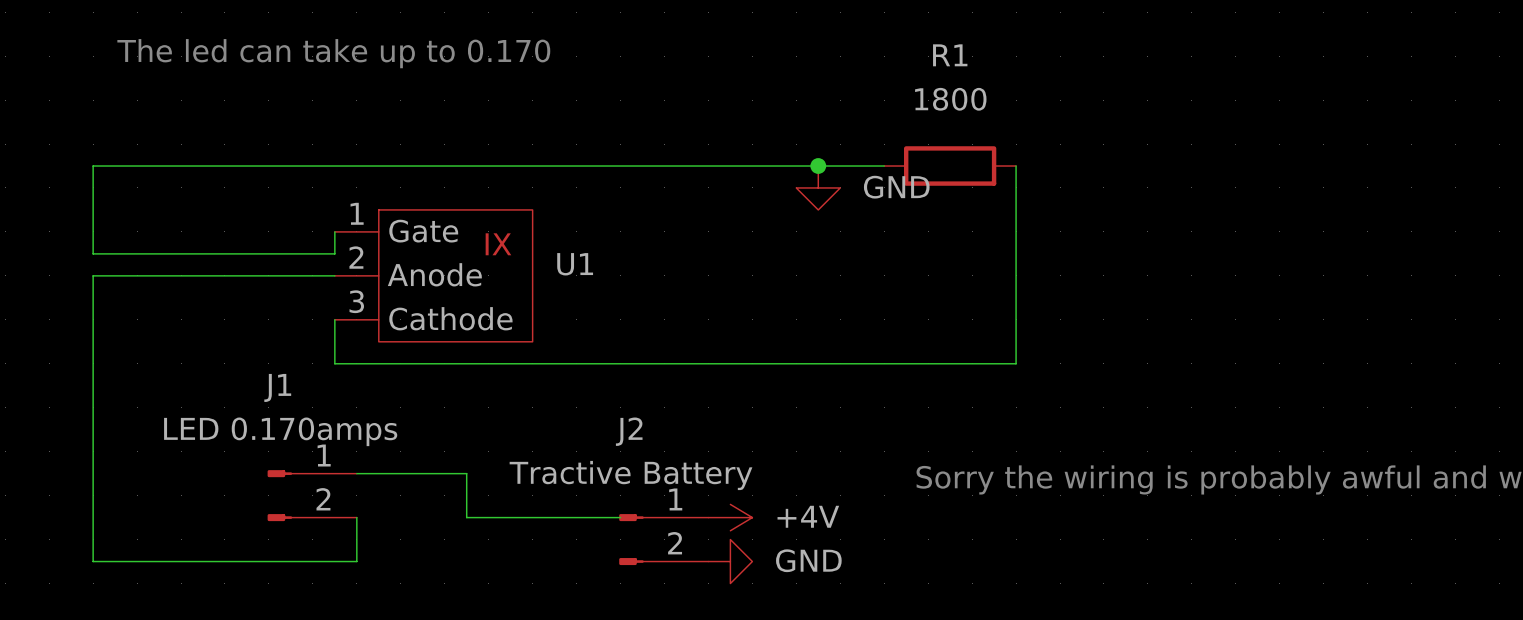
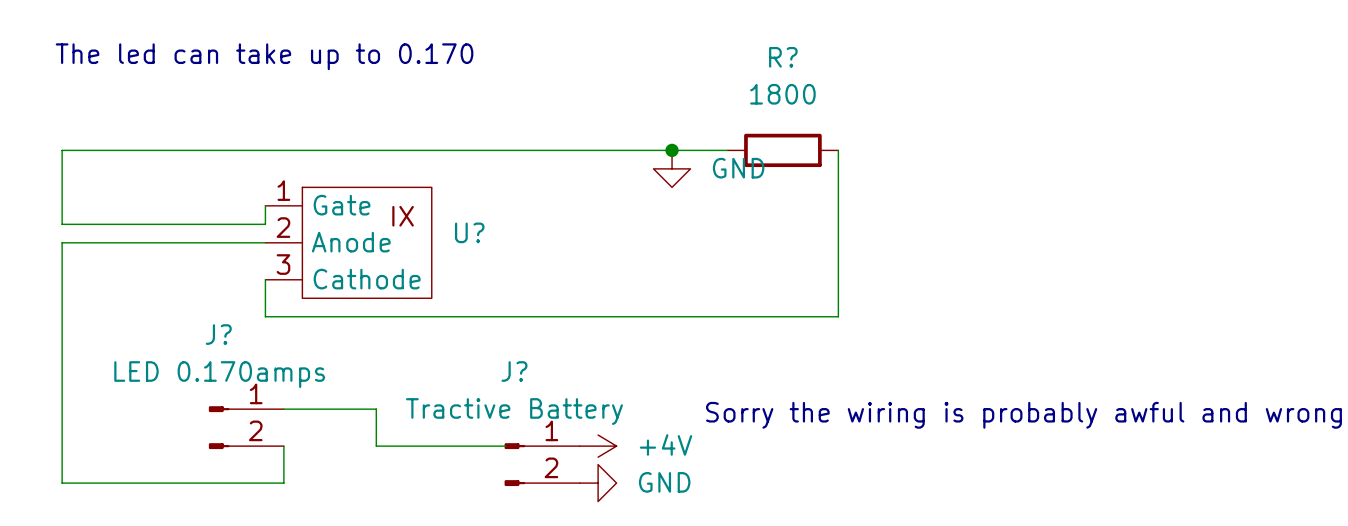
R1 name: R1 (950, 55) -> R? (783, 57)
U1 name: U1 (575, 264) -> U? (469, 232)
J1 name: J1 (277, 387) -> J? (218, 334)
J2 name: J2 (629, 431) -> J? (514, 371)

